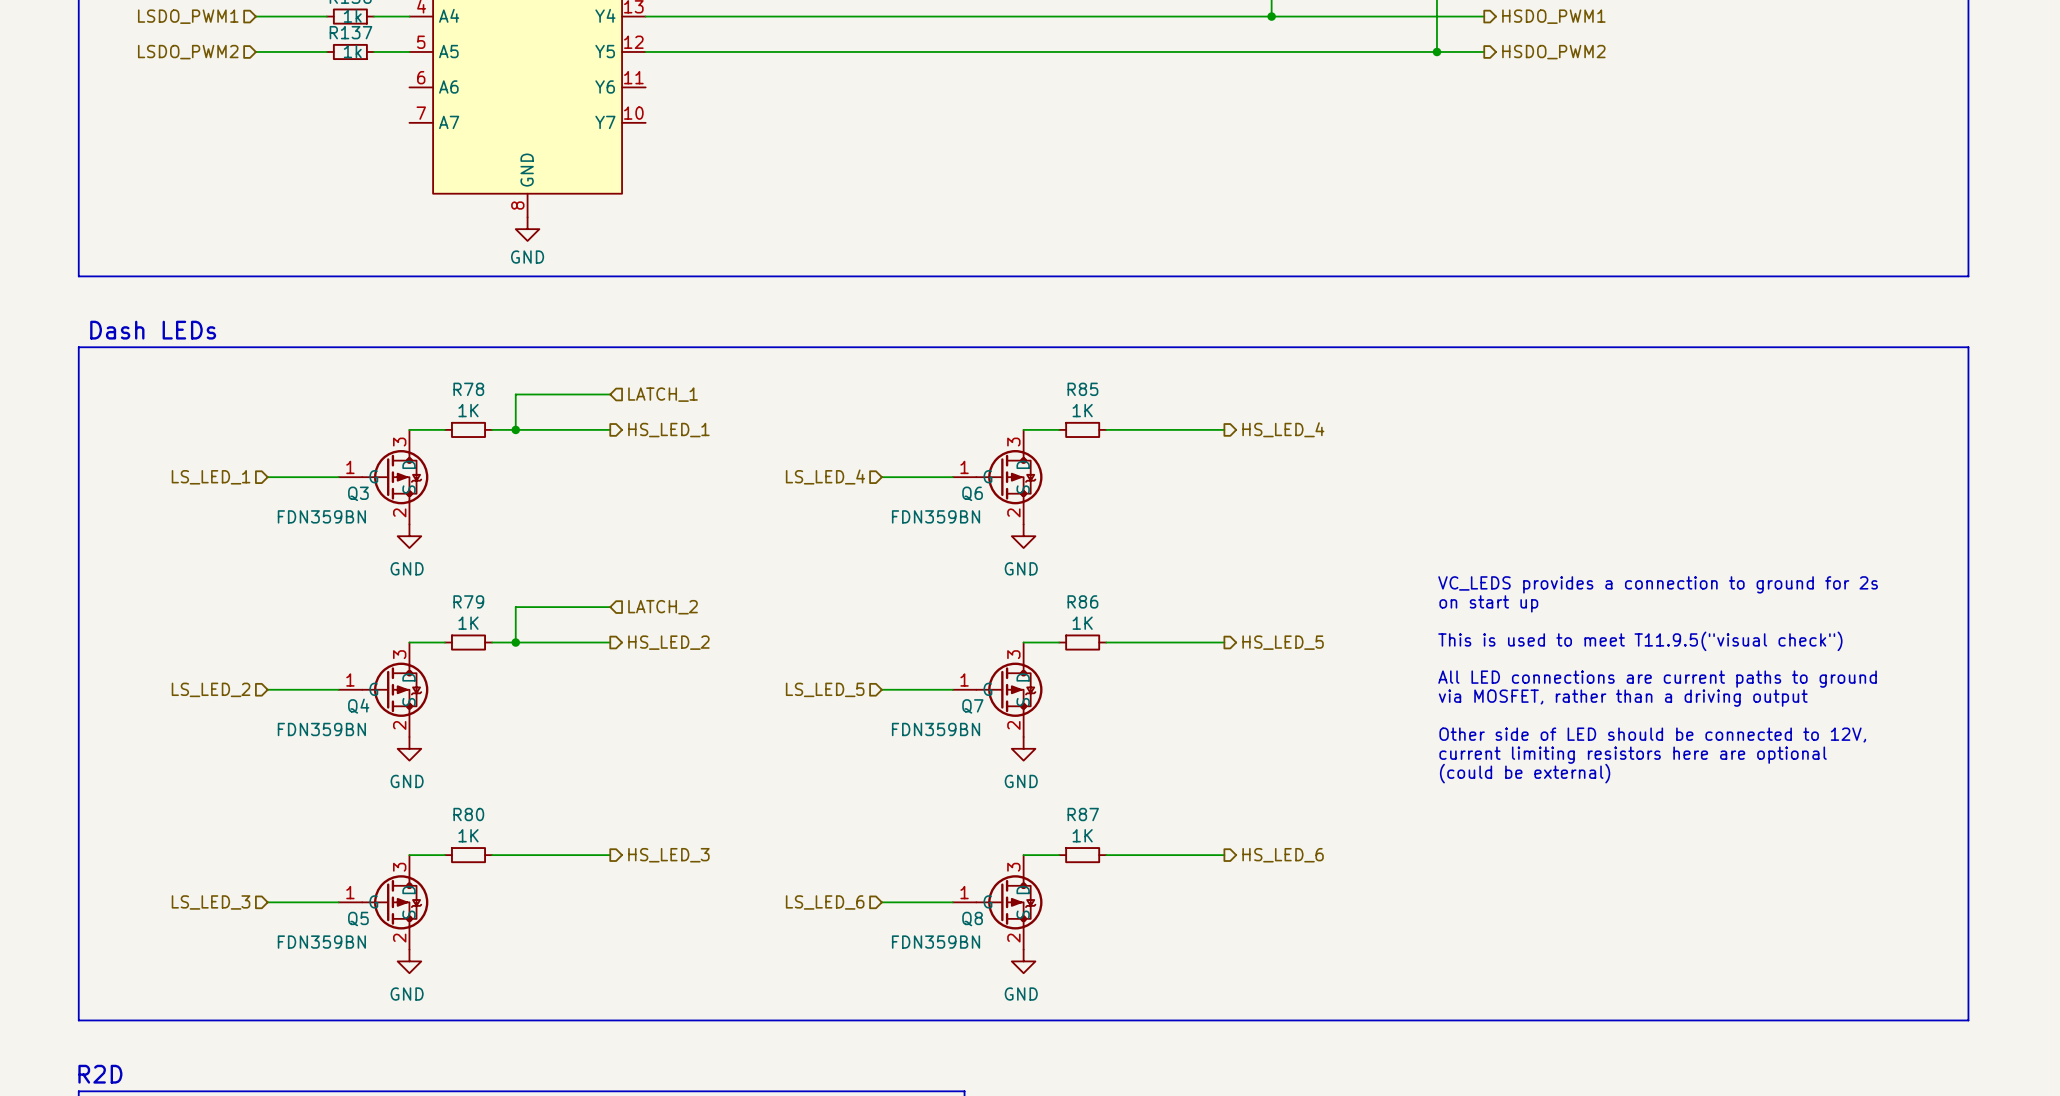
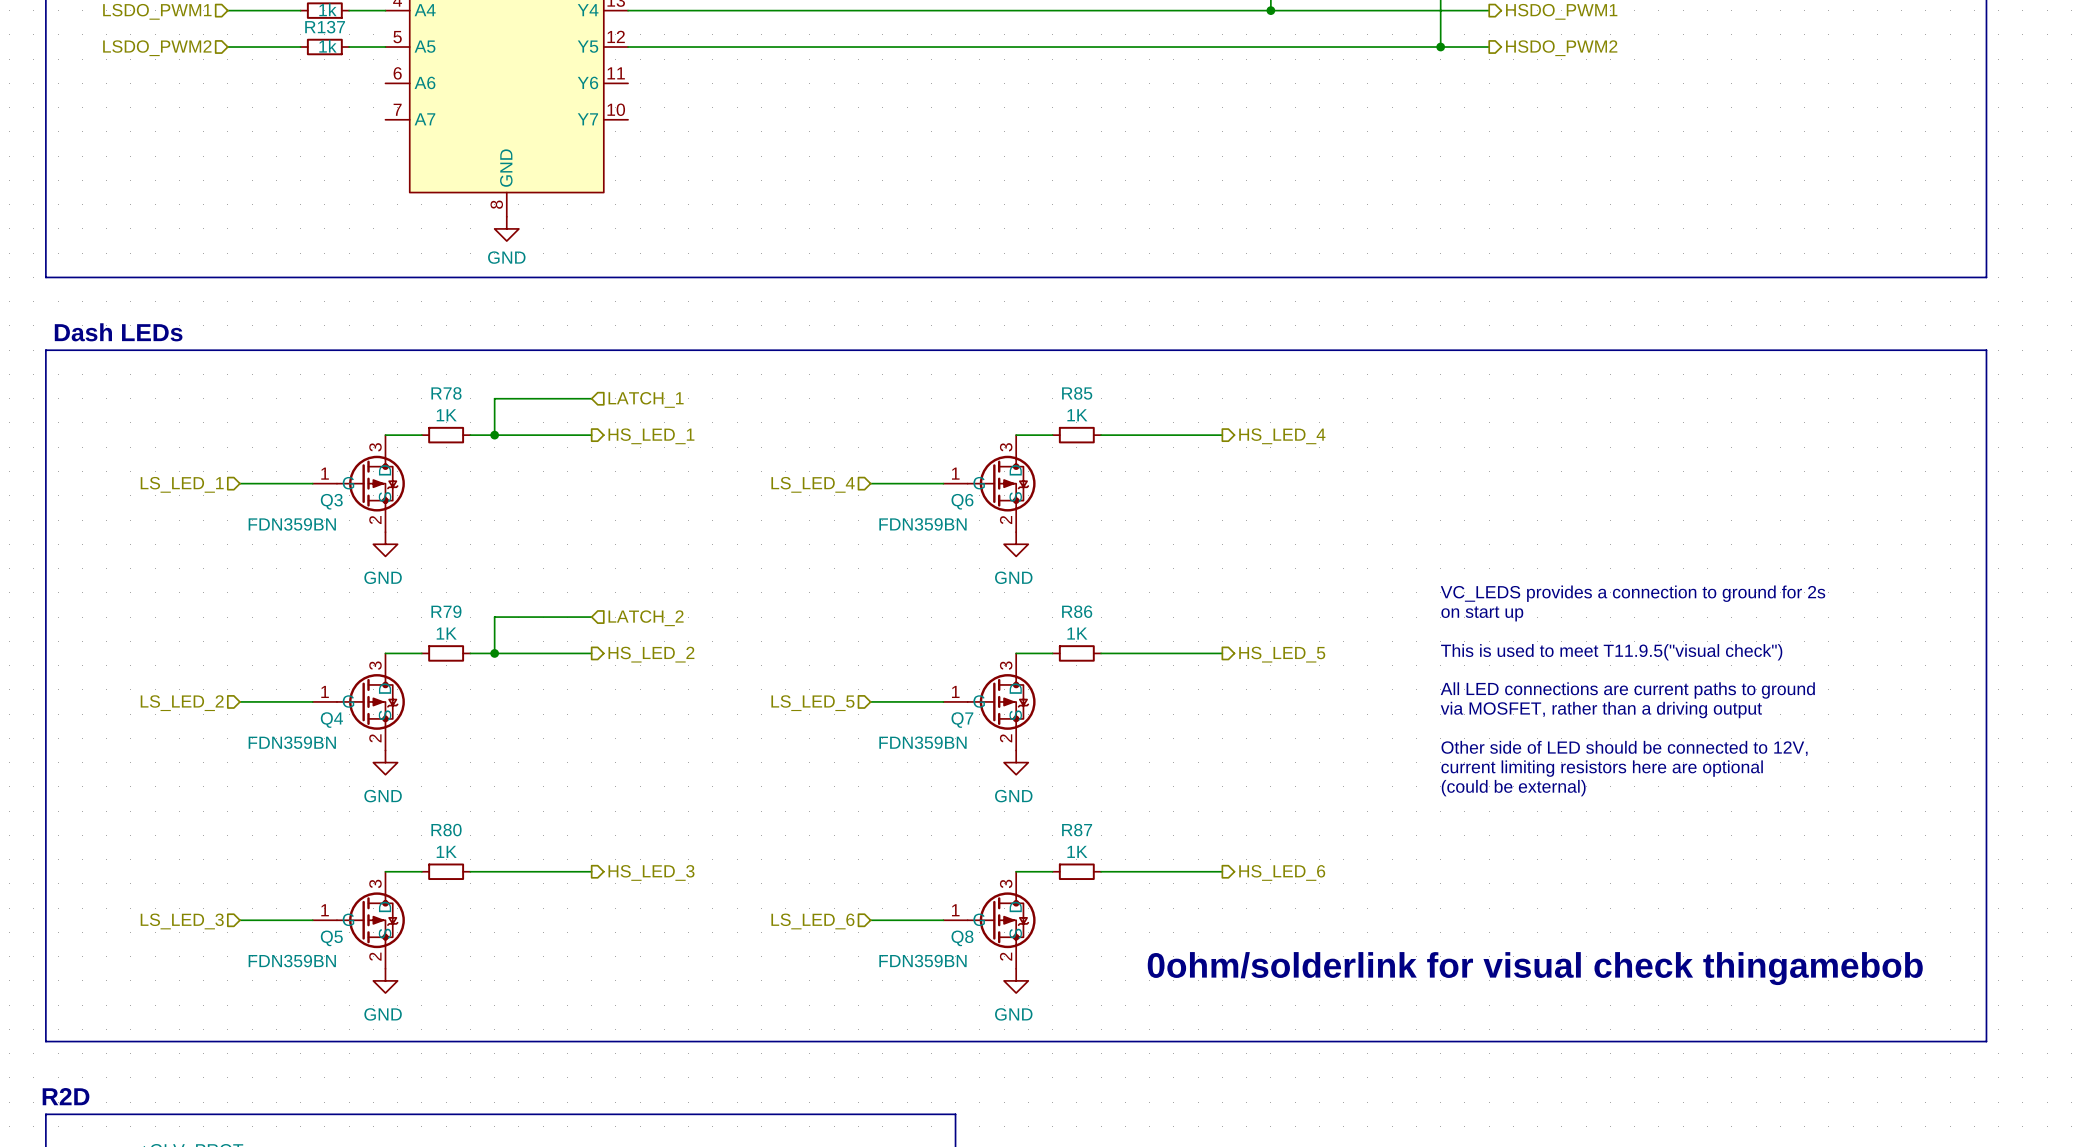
text: none -> 0ohm/solderlink for visual check thingamebob (1535, 968)

